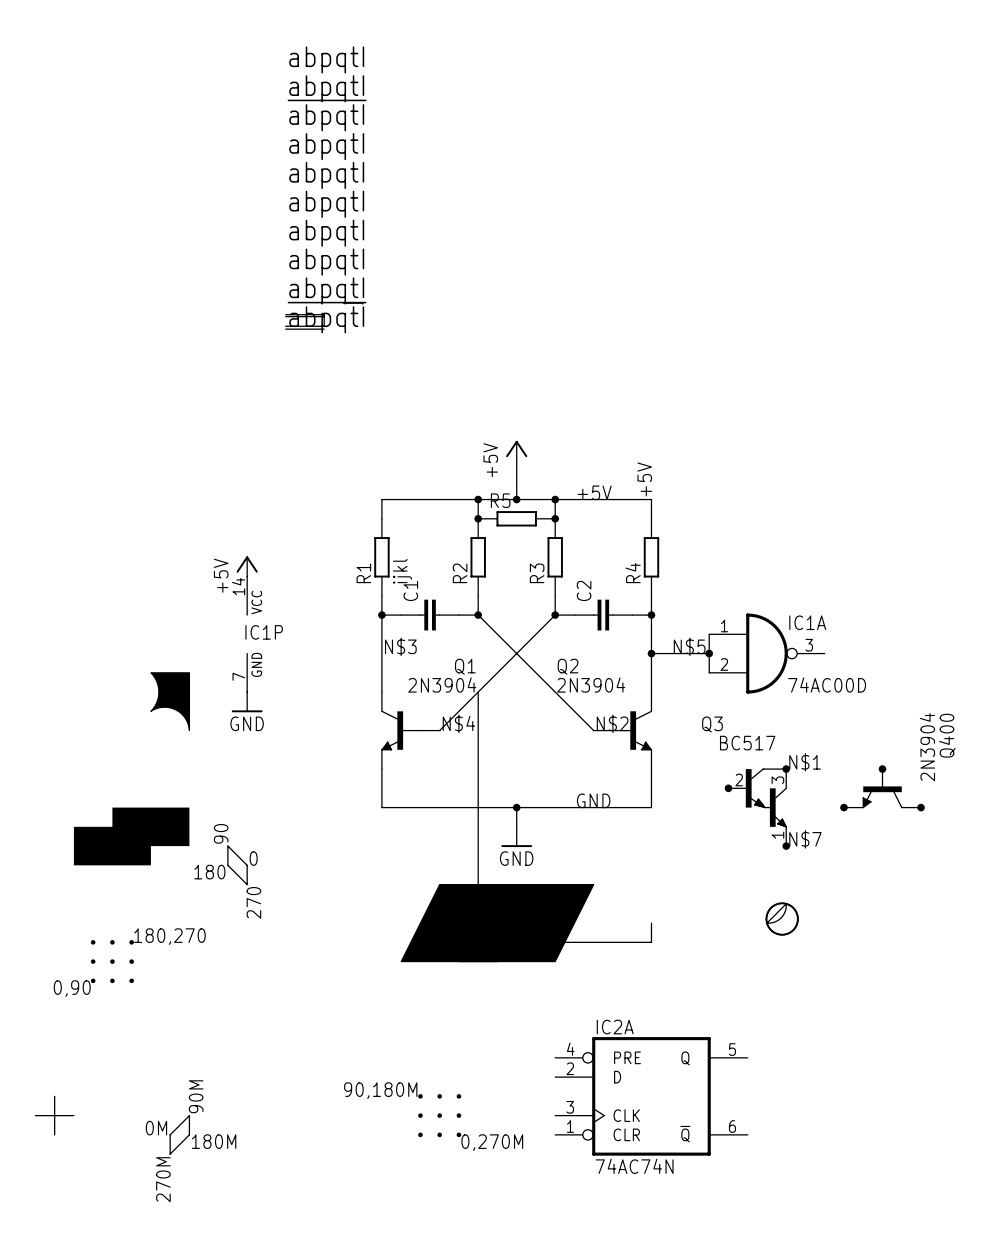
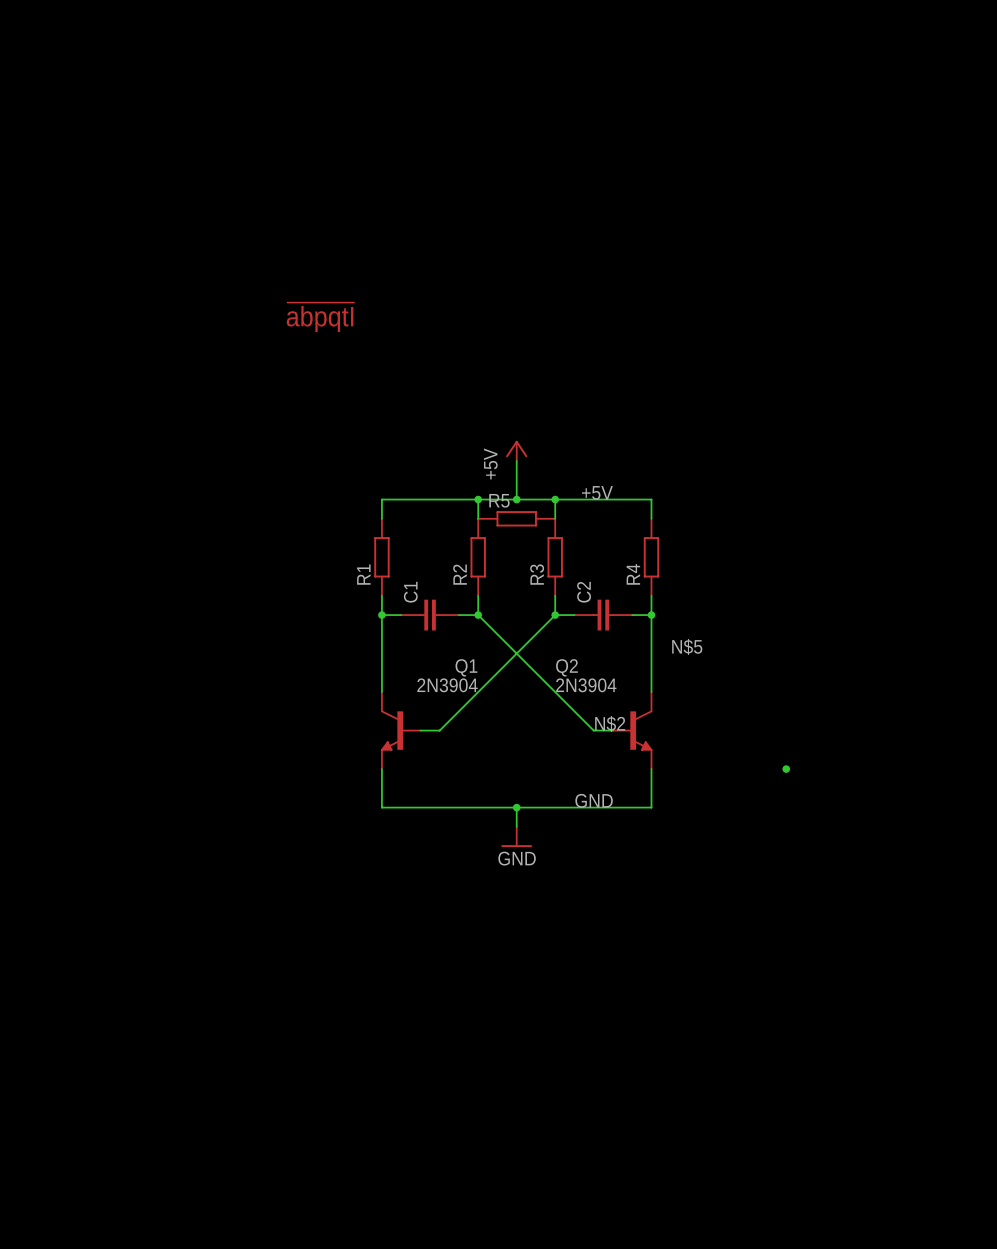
text: abpqtI (326, 59) -> none
text: abpqtI (326, 88) -> none
text: ~{abpqtI} (327, 115) -> none
text: abpqtI (326, 146) -> none
text: abpqtI (326, 175) -> none
text: abpqtI (326, 204) -> none
text: abpqtI (326, 233) -> none
text: abpqtI (326, 262) -> none
text: abpqtI (326, 290) -> none
line: (343, 303) (362, 304) -> none
line: (285, 314) (324, 314) (324, 326) (285, 326) -> none
line: (285, 316) (324, 316) -> none
line: (285, 329) (324, 329) -> none
label: +5V (644, 479) -> none
junction: (478, 518) -> none
junction: (555, 518) -> none
power symbol: +5V (247, 566) -> none
R1 value: ijkl (402, 571) -> none
IC1P: (247, 634) -> none
wire: (709, 634) (709, 672) -> none
label: N$3 (400, 646) -> none
wire: (651, 653) (709, 653) -> none
junction: (651, 653) -> none
junction: (709, 653) -> none
IC1A: 74AC00D (766, 653) -> none
drawing: [150, 672, 190, 732] -> none
line: (478, 692) (478, 884) -> none
power symbol: GND (247, 702) -> none
label: N$4 (458, 723) -> none
label: N$1 (805, 762) -> none
junction: (882, 769) -> none
junction: (728, 788) -> none
Q400: 2N3904 (882, 788) -> none
Q3: BC517 (758, 806) -> none
drawing: [73, 807, 190, 866] -> none
junction: (844, 807) -> none
junction: (921, 807) -> none
text: 90 (221, 833) -> none
label: N$7 (805, 839) -> none
line: (227, 846) (227, 865) (247, 884) (247, 865) (227, 846) -> none
junction: (786, 846) -> none
text: 0 (253, 858) -> none
text: 180 (209, 872) -> none
drawing: [400, 884, 595, 963] -> none
text: 270 (253, 902) -> none
drawing: [765, 902, 799, 936] -> none
line: (786, 903) (766, 923) -> none
line: (786, 903) (784, 912) (781, 917) (775, 921) (766, 923) -> none
line: (651, 923) (651, 942) (555, 942) -> none
text: 180,270 (169, 936) -> none
drawing: [90, 940, 96, 945] -> none
drawing: [110, 940, 115, 945] -> none
drawing: [129, 940, 134, 945] -> none
drawing: [90, 959, 96, 964] -> none
drawing: [110, 959, 115, 964] -> none
drawing: [129, 959, 134, 964] -> none
drawing: [90, 978, 96, 984] -> none
drawing: [110, 978, 115, 984] -> none
drawing: [129, 978, 134, 984] -> none
text: 0,90 (72, 988) -> none
text: 90,180M (380, 1090) -> none
drawing: [418, 1094, 423, 1099] -> none
drawing: [437, 1094, 442, 1099] -> none
drawing: [456, 1094, 462, 1099] -> none
line: (54, 1096) (54, 1134) -> none
text: 90M (196, 1096) -> none
IC2A: 74AC74N (651, 1096) -> none
drawing: [418, 1113, 423, 1118] -> none
drawing: [437, 1113, 442, 1118] -> none
drawing: [456, 1113, 462, 1118] -> none
line: (35, 1115) (73, 1115) -> none
line: (189, 1115) (189, 1134) (170, 1154) (170, 1134) (189, 1115) -> none
text: 0M (156, 1128) -> none
drawing: [418, 1132, 423, 1138] -> none
drawing: [437, 1132, 442, 1138] -> none
drawing: [456, 1132, 462, 1138] -> none
text: 180M (214, 1141) -> none
text: 0,270M (492, 1142) -> none
text: 270M (163, 1179) -> none

